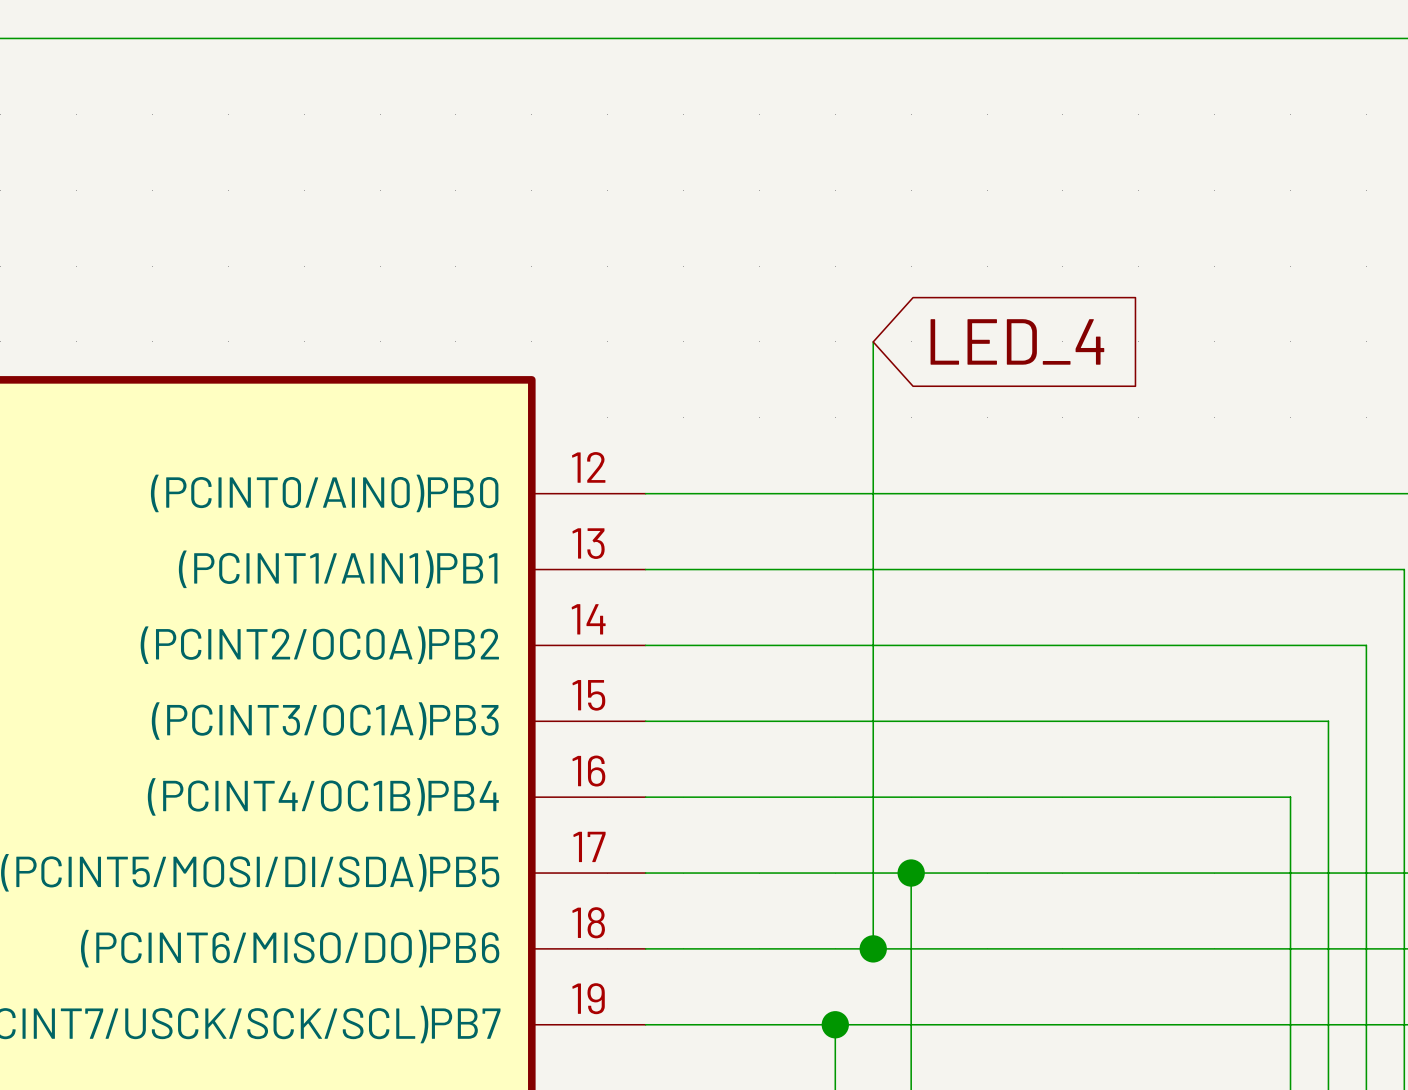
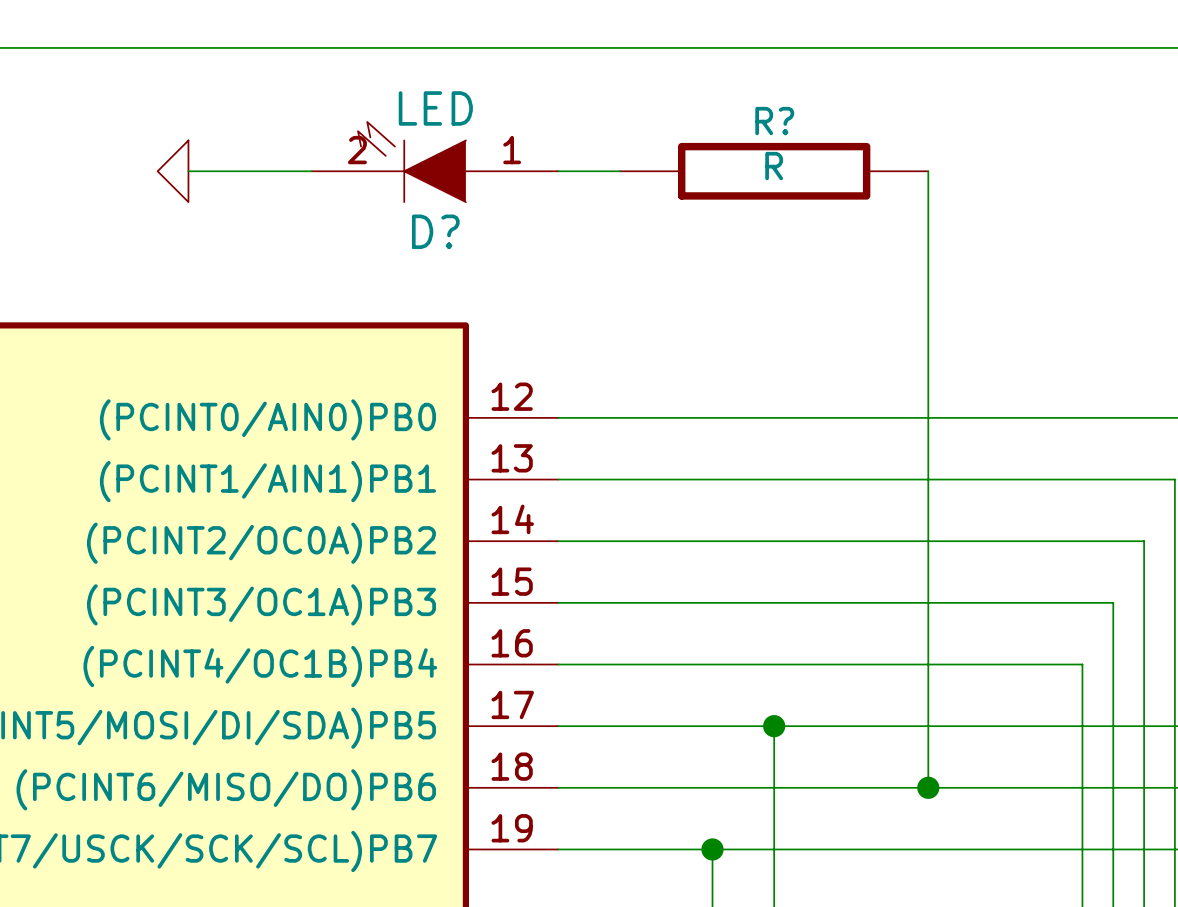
D?: none -> LED (435, 162)
power symbol: none -> (173, 171)
wire: none -> (188, 171) (311, 171)
wire: none -> (558, 171) (620, 171)
R?: none -> R (774, 171)
wire: none -> (928, 171) (928, 787)
wire: (873, 341) (873, 948) -> none
global label: LED_4 (1017, 341) -> none
junction: (873, 948) -> none
junction: none -> (928, 787)

